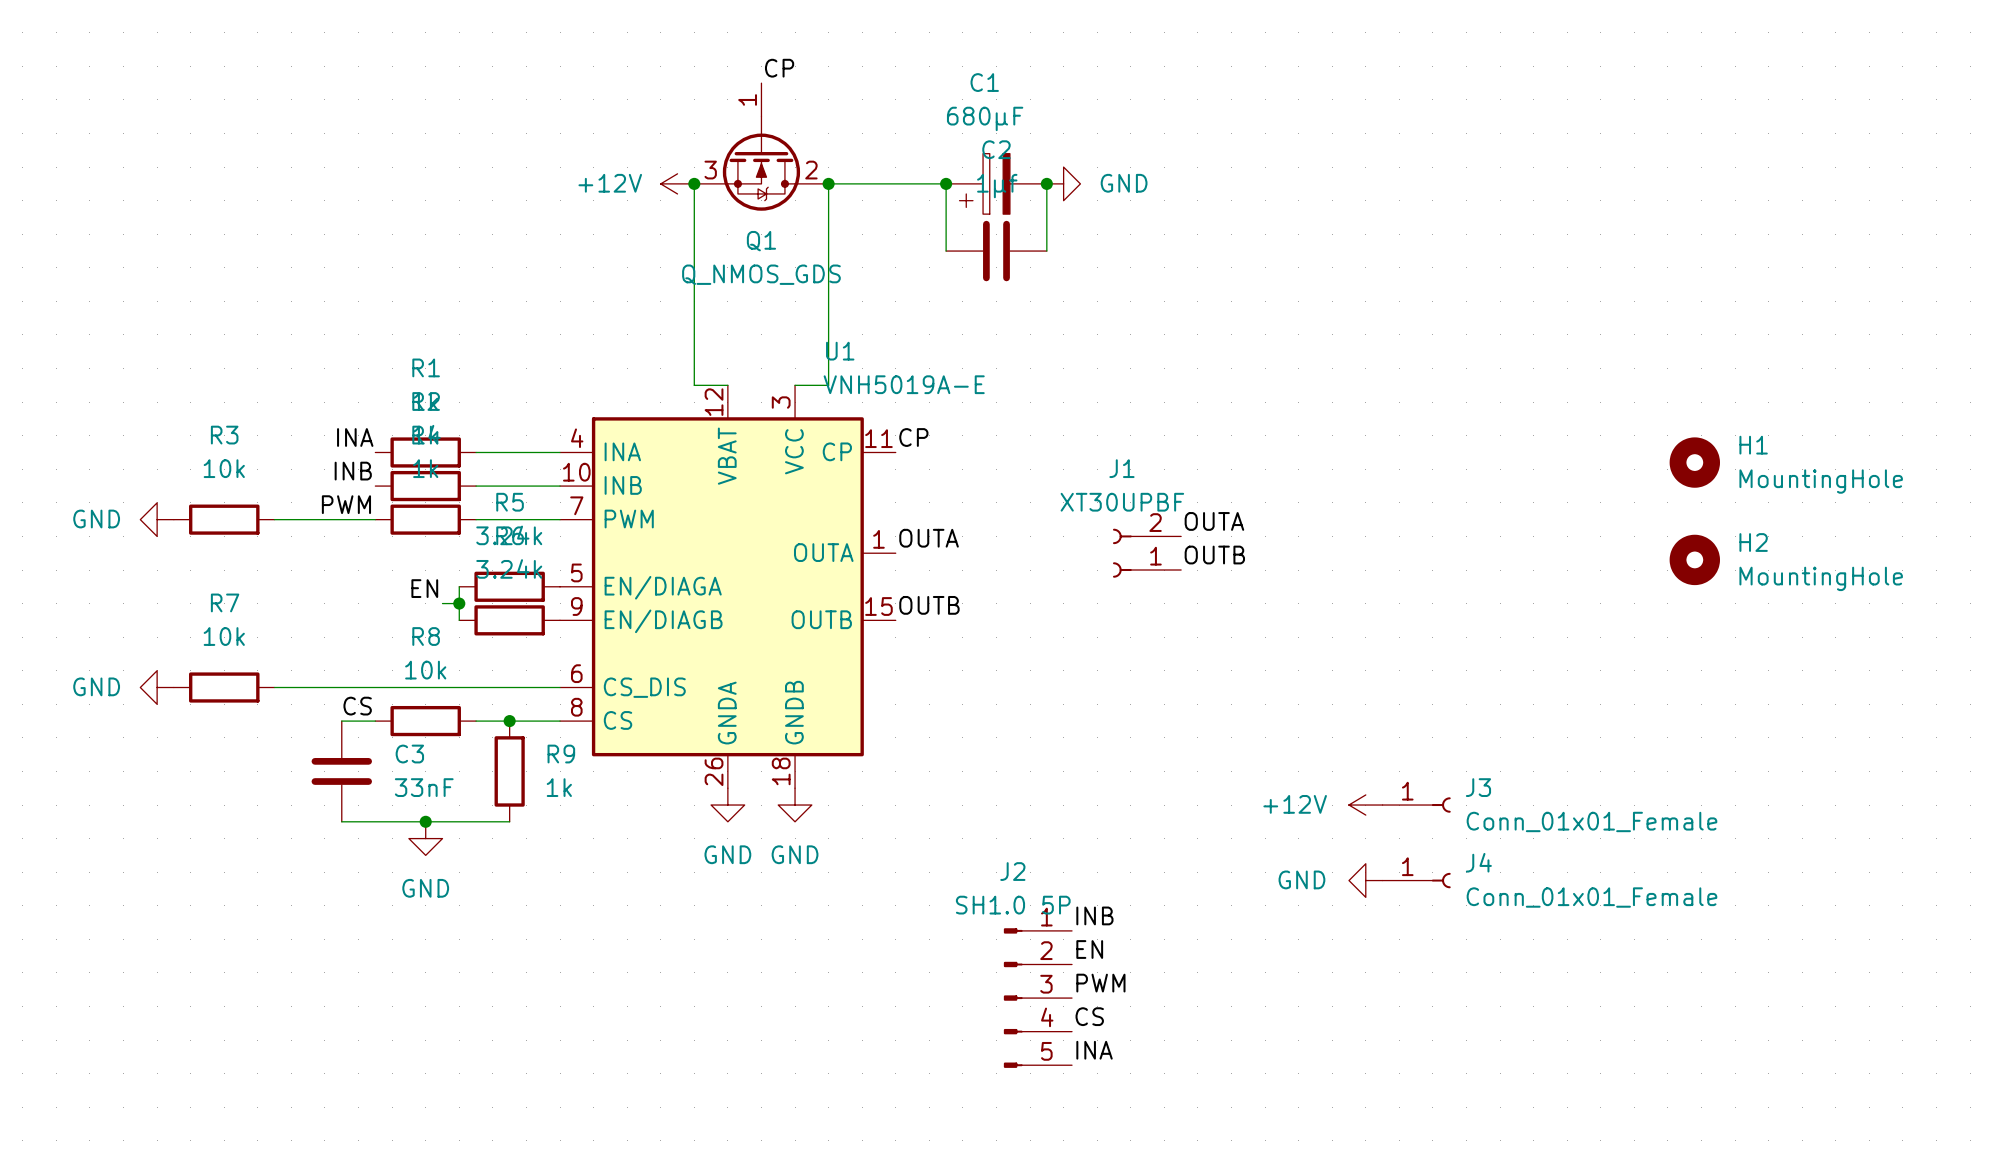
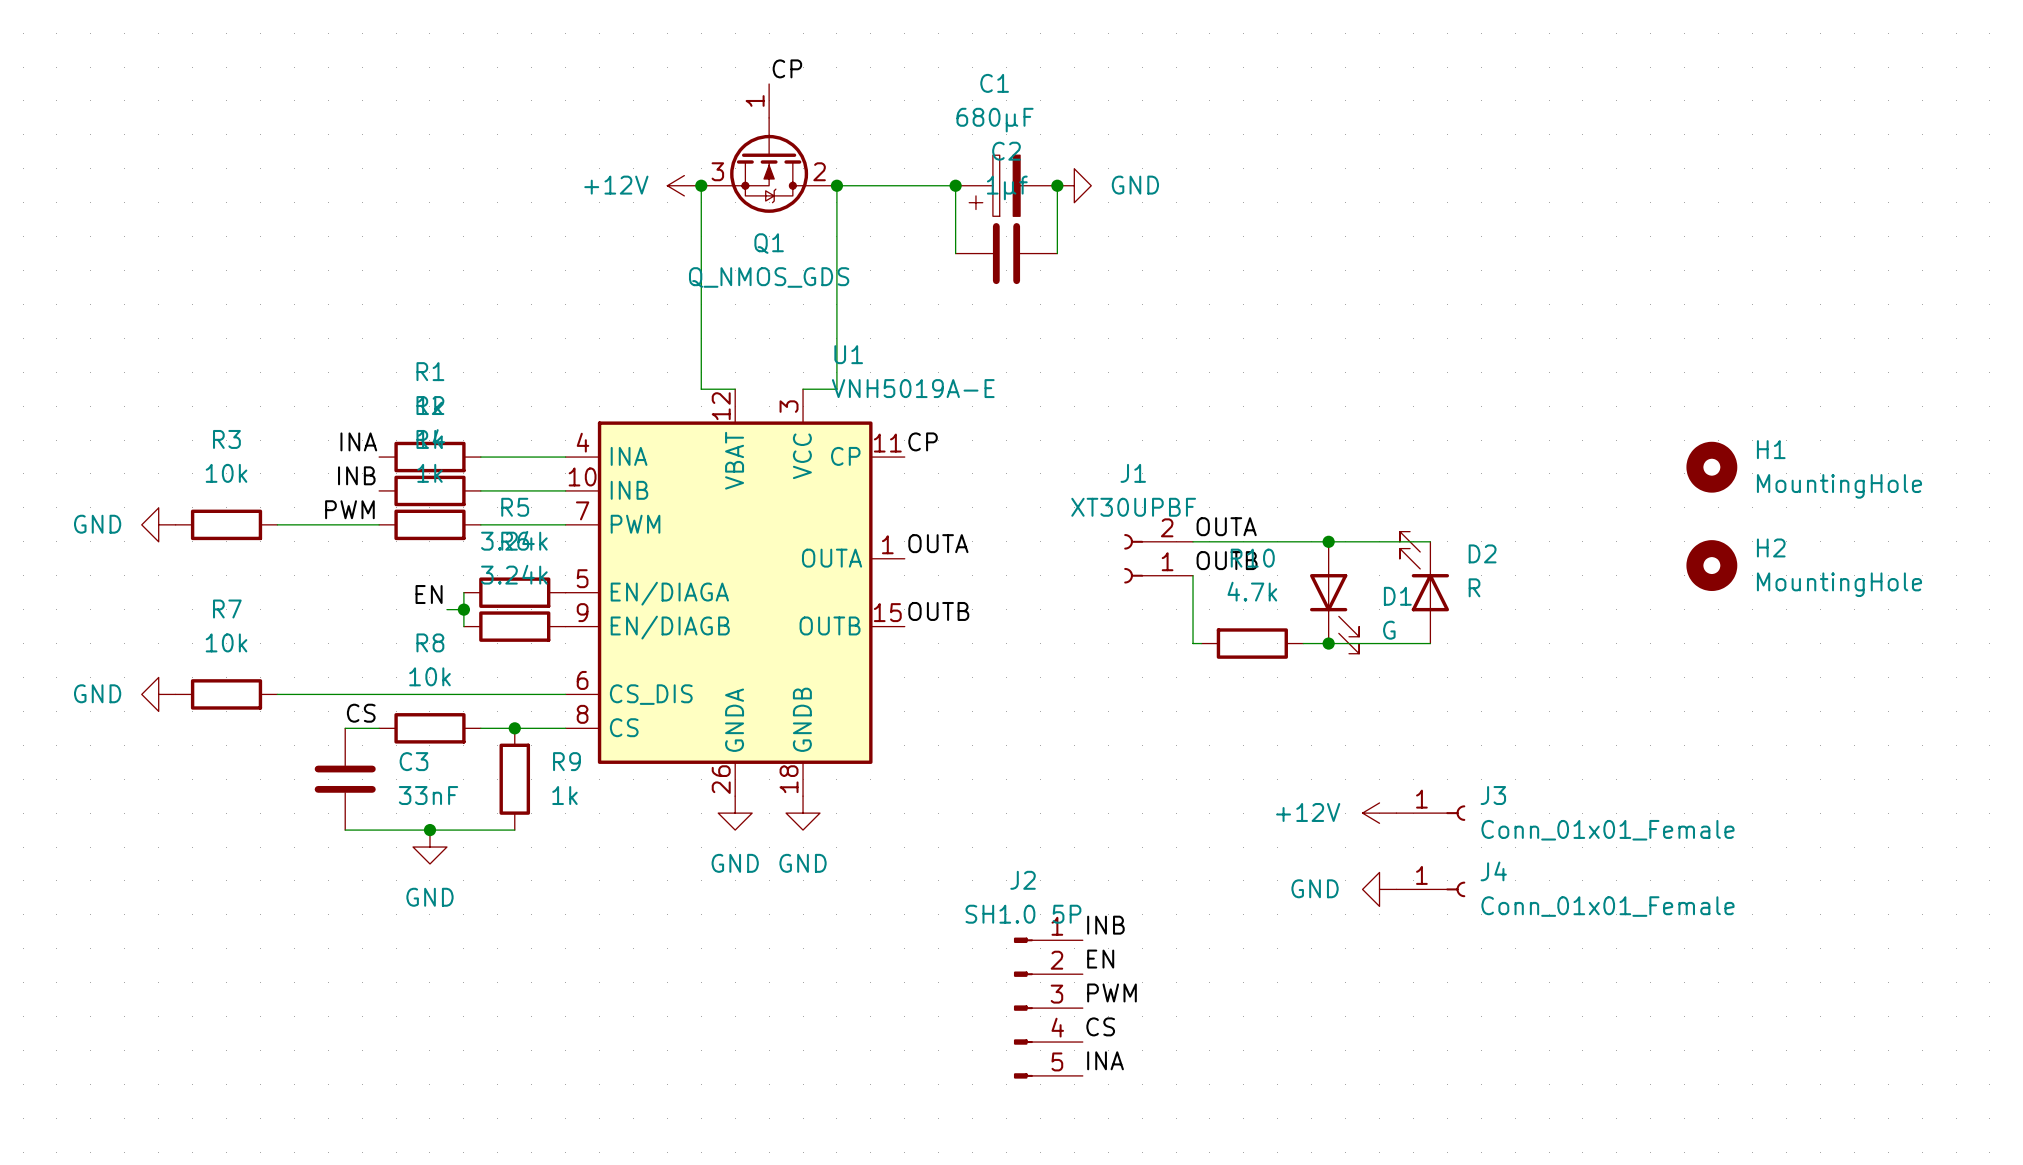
wire: none -> (1193, 541) (1430, 541)
junction: none -> (1328, 541)
wire: none -> (1193, 575) (1193, 643) (1201, 643)
D2: none -> R (1424, 587)
D1: none -> G (1334, 597)
R10: none -> 4.7k (1252, 643)
wire: none -> (1303, 643) (1430, 643)
junction: none -> (1328, 643)

